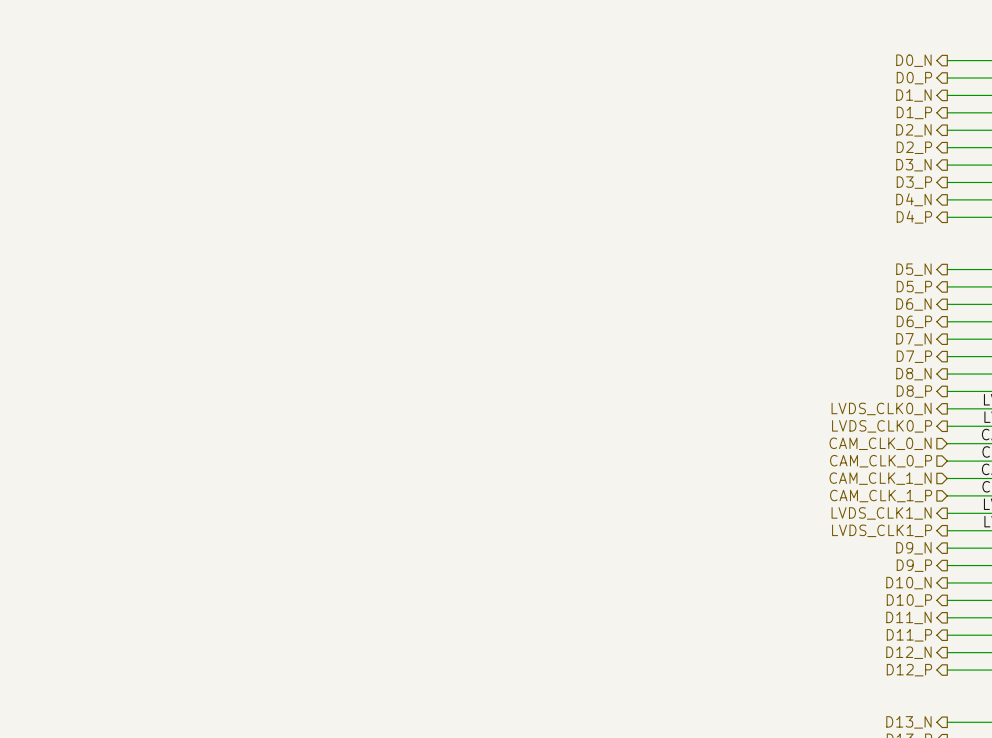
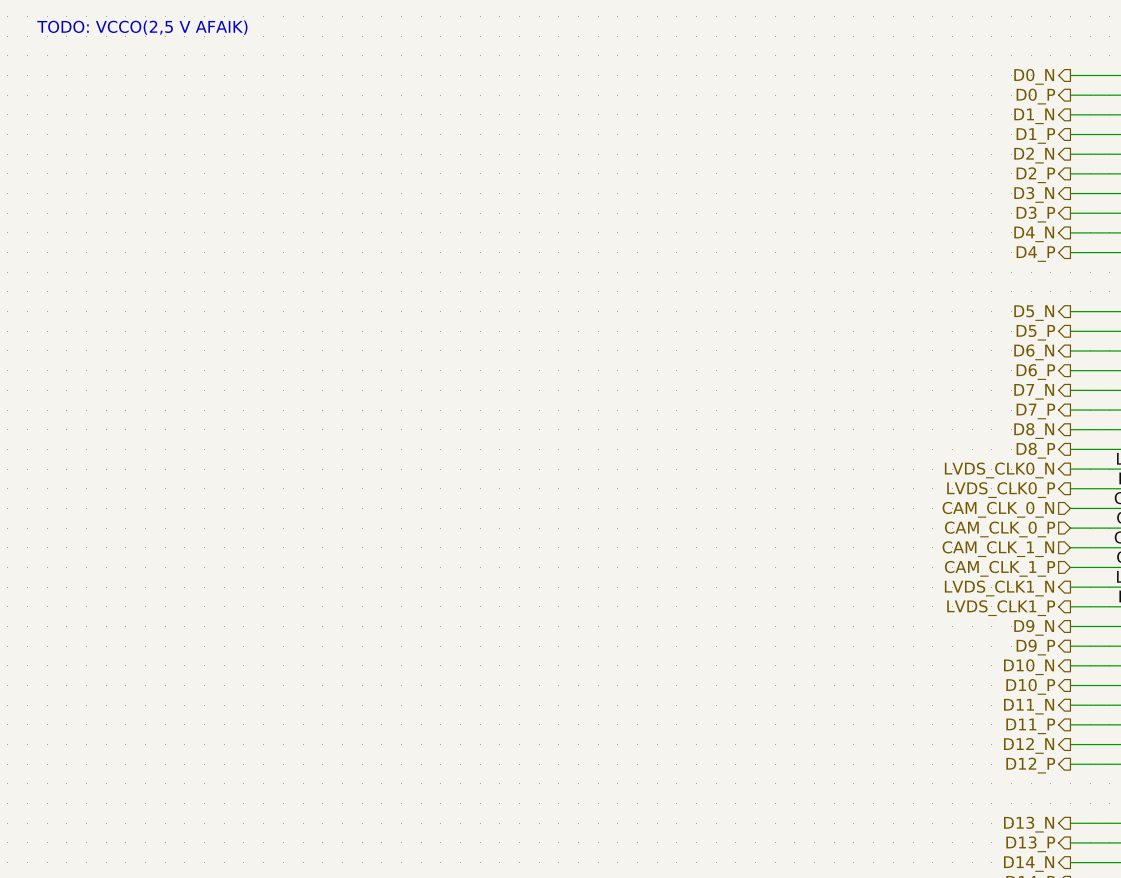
text: none -> TODO: VCCO(2,5 V AFAIK) (142, 27)

